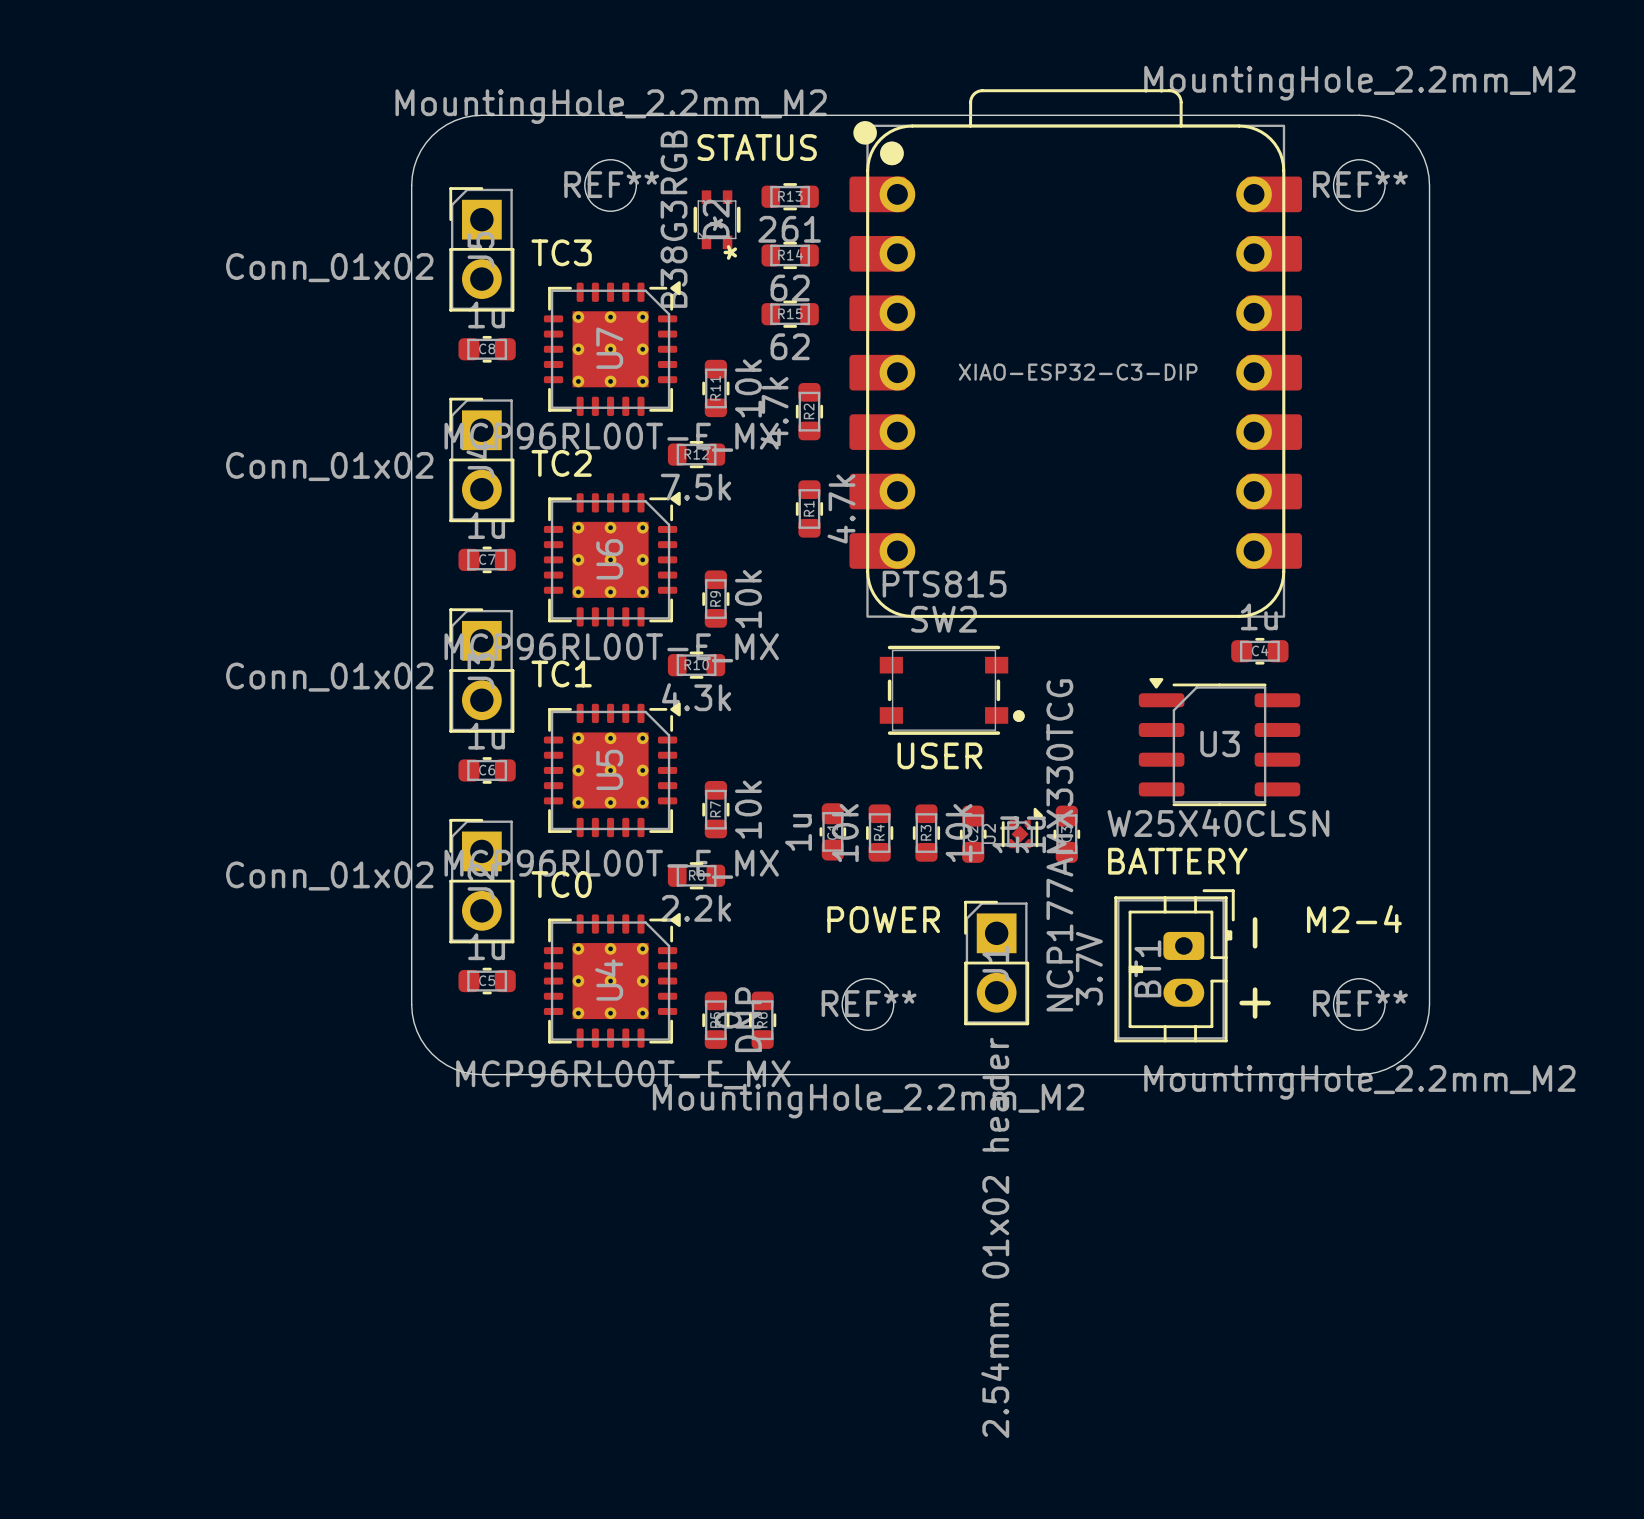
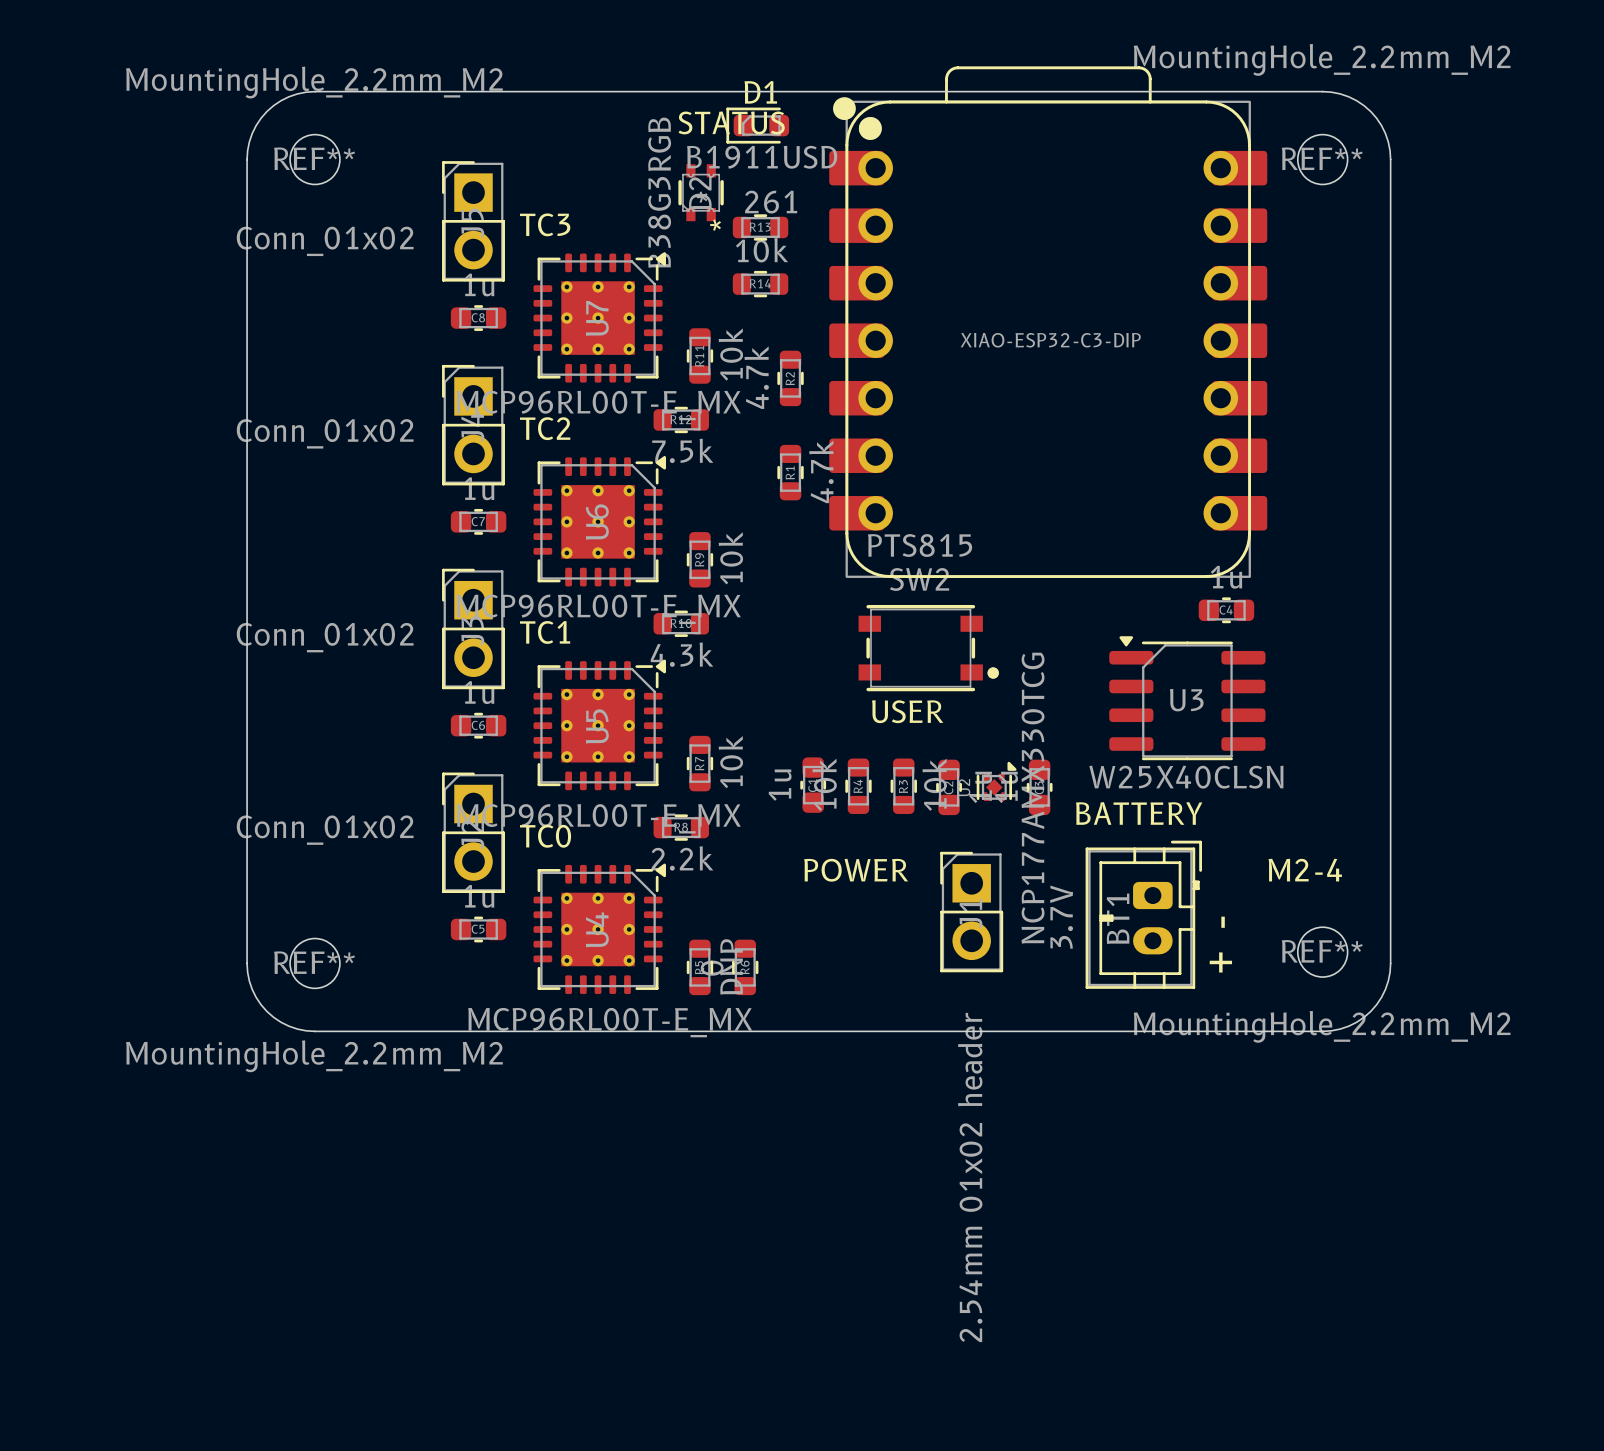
board edge: (481, 115) (455, 120) (432, 135) (417, 158) (411, 185) (411, 1004) (417, 1031) (432, 1054) (455, 1069) (481, 1074) (1359, 1074) (1386, 1069) (1408, 1054) (1424, 1031) (1429, 1004) -> (473, 91) (314, 91) (297, 93) (281, 100) (266, 111) (256, 125) (249, 141) (247, 159) (247, 963) (252, 989) (266, 1011) (288, 1026) (314, 1031) (1322, 1031) (1348, 1026) (1364, 1017) (1376, 1004) (1388, 981) (1390, 952)
D1: none -> B1911USD (757, 125)
REF** position: (610, 185) -> (314, 159)
R13 position: (790, 196) -> (760, 227)
R14 position: (790, 255) -> (760, 284)
R14 value: 62 (790, 288) -> 10k (762, 250)
R15: 62 (790, 314) -> none
REF**: MountingHole_2.2mm_M2 (867, 1004) -> none
REF**: none -> MountingHole_2.2mm_M2 (314, 963)

